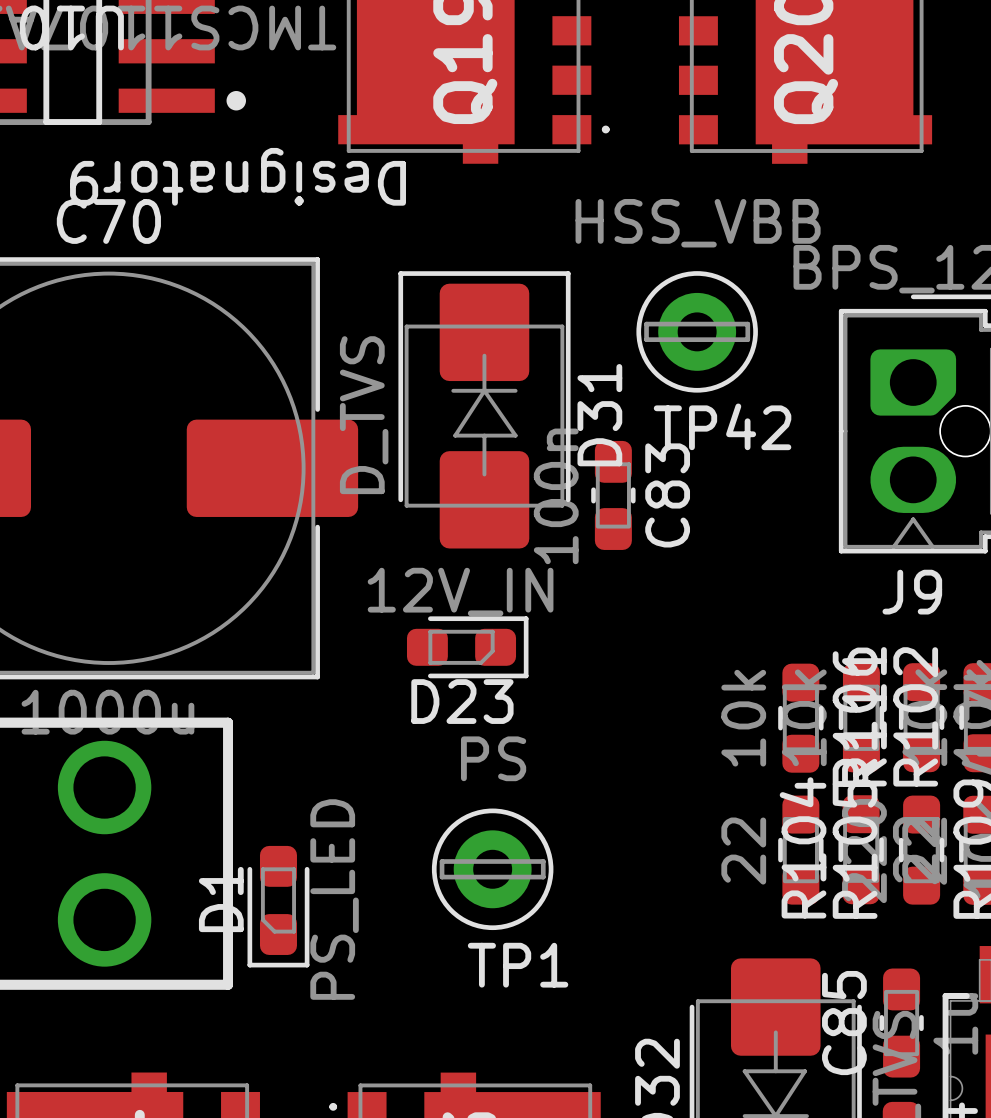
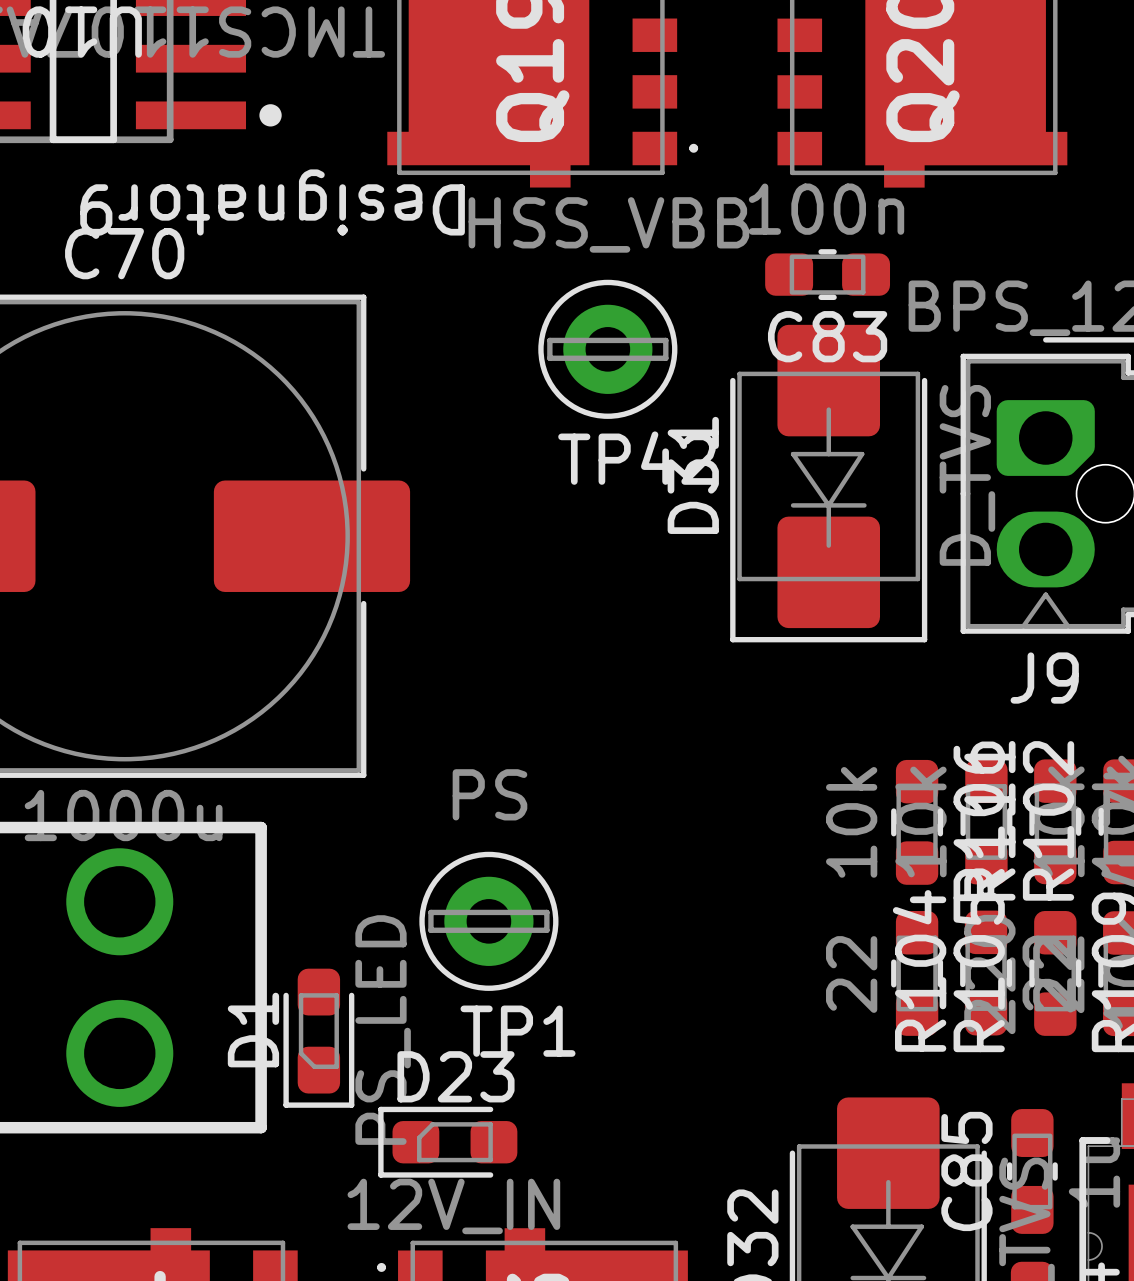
TP42 position: (697, 331) -> (607, 349)
D31 rotation: 0° (484, 409) -> 180° (828, 483)
D31 position: (484, 409) -> (828, 483)
C83 rotation: 0° (613, 495) -> 90° clockwise (827, 274)
C83 position: (613, 495) -> (827, 274)
D23 rotation: 0° (467, 647) -> 180° (447, 1142)
D23 position: (467, 647) -> (447, 1142)
TP1 position: (492, 869) -> (488, 921)

